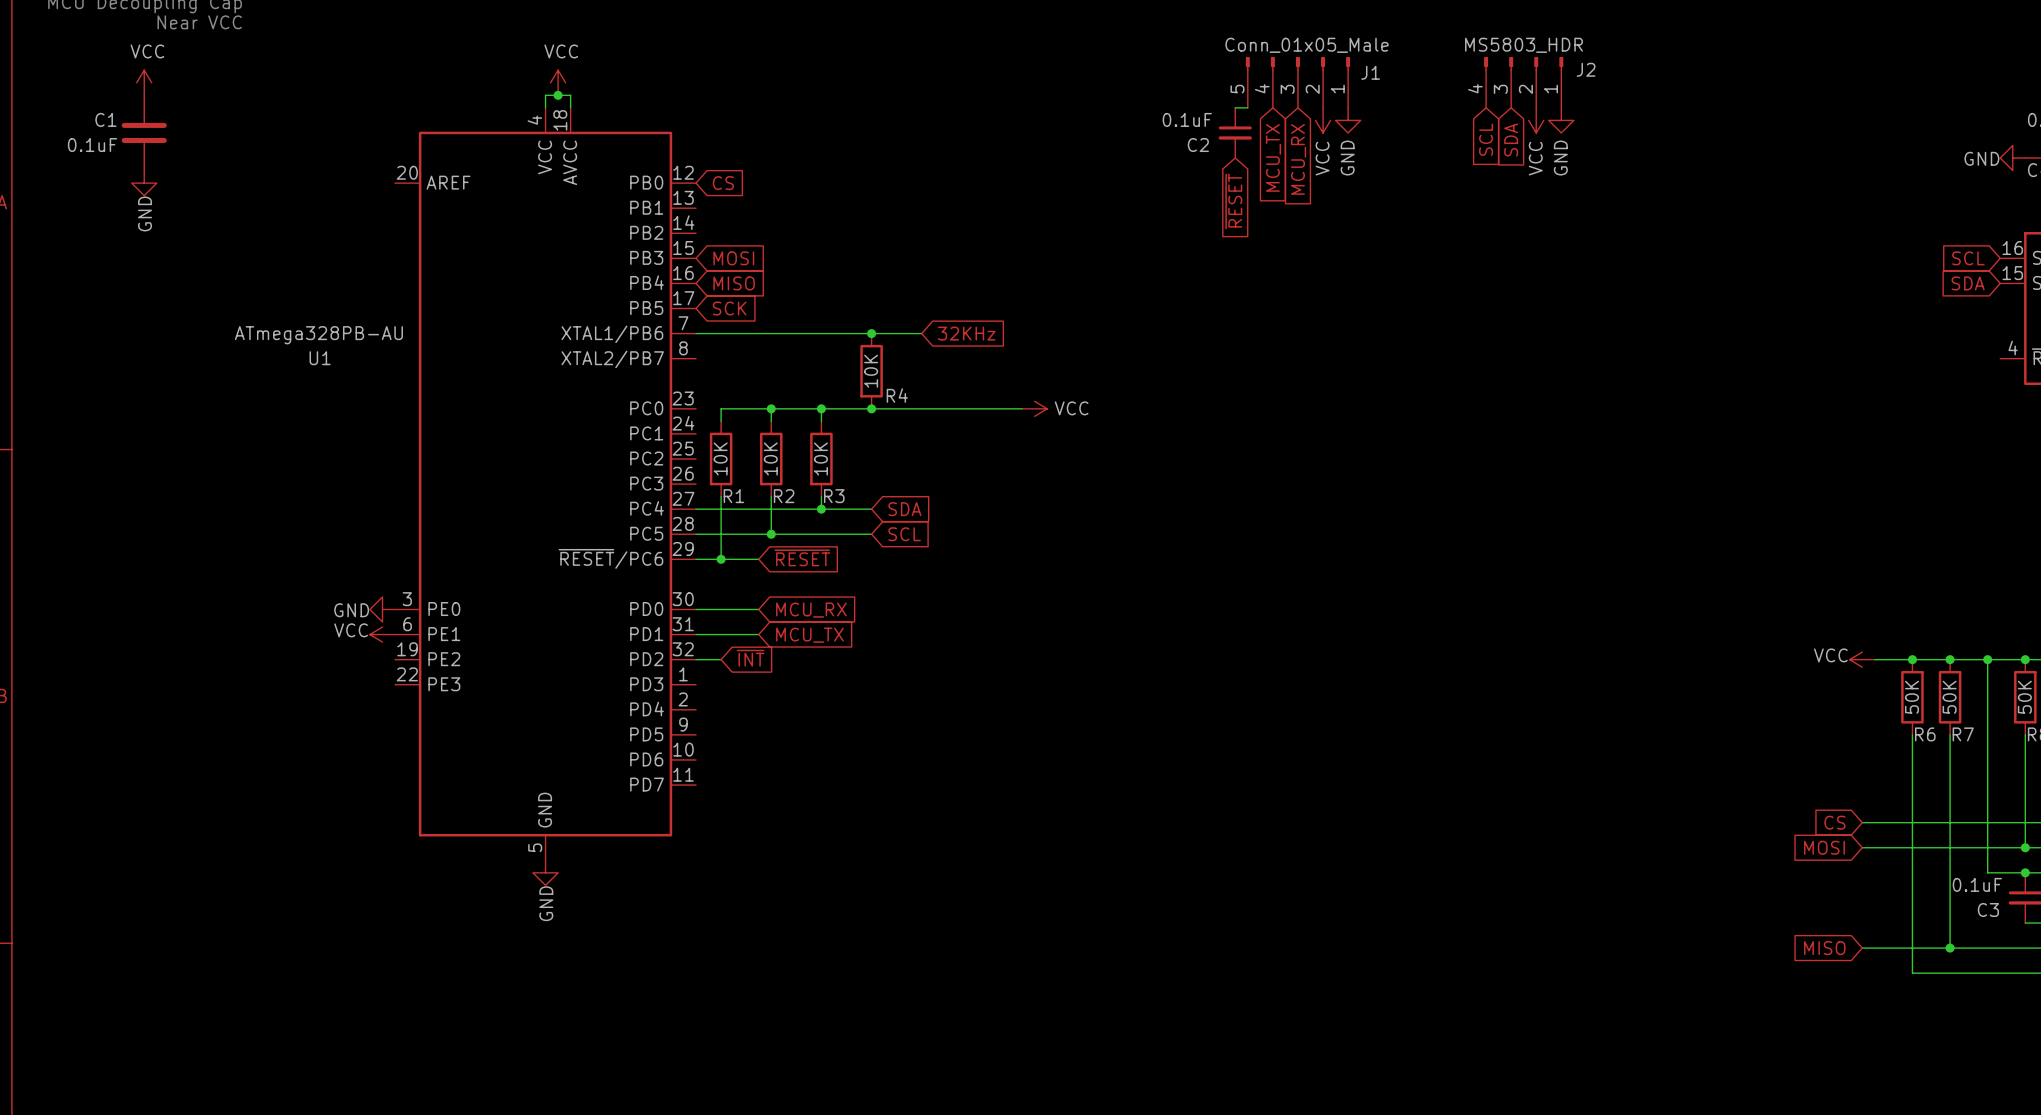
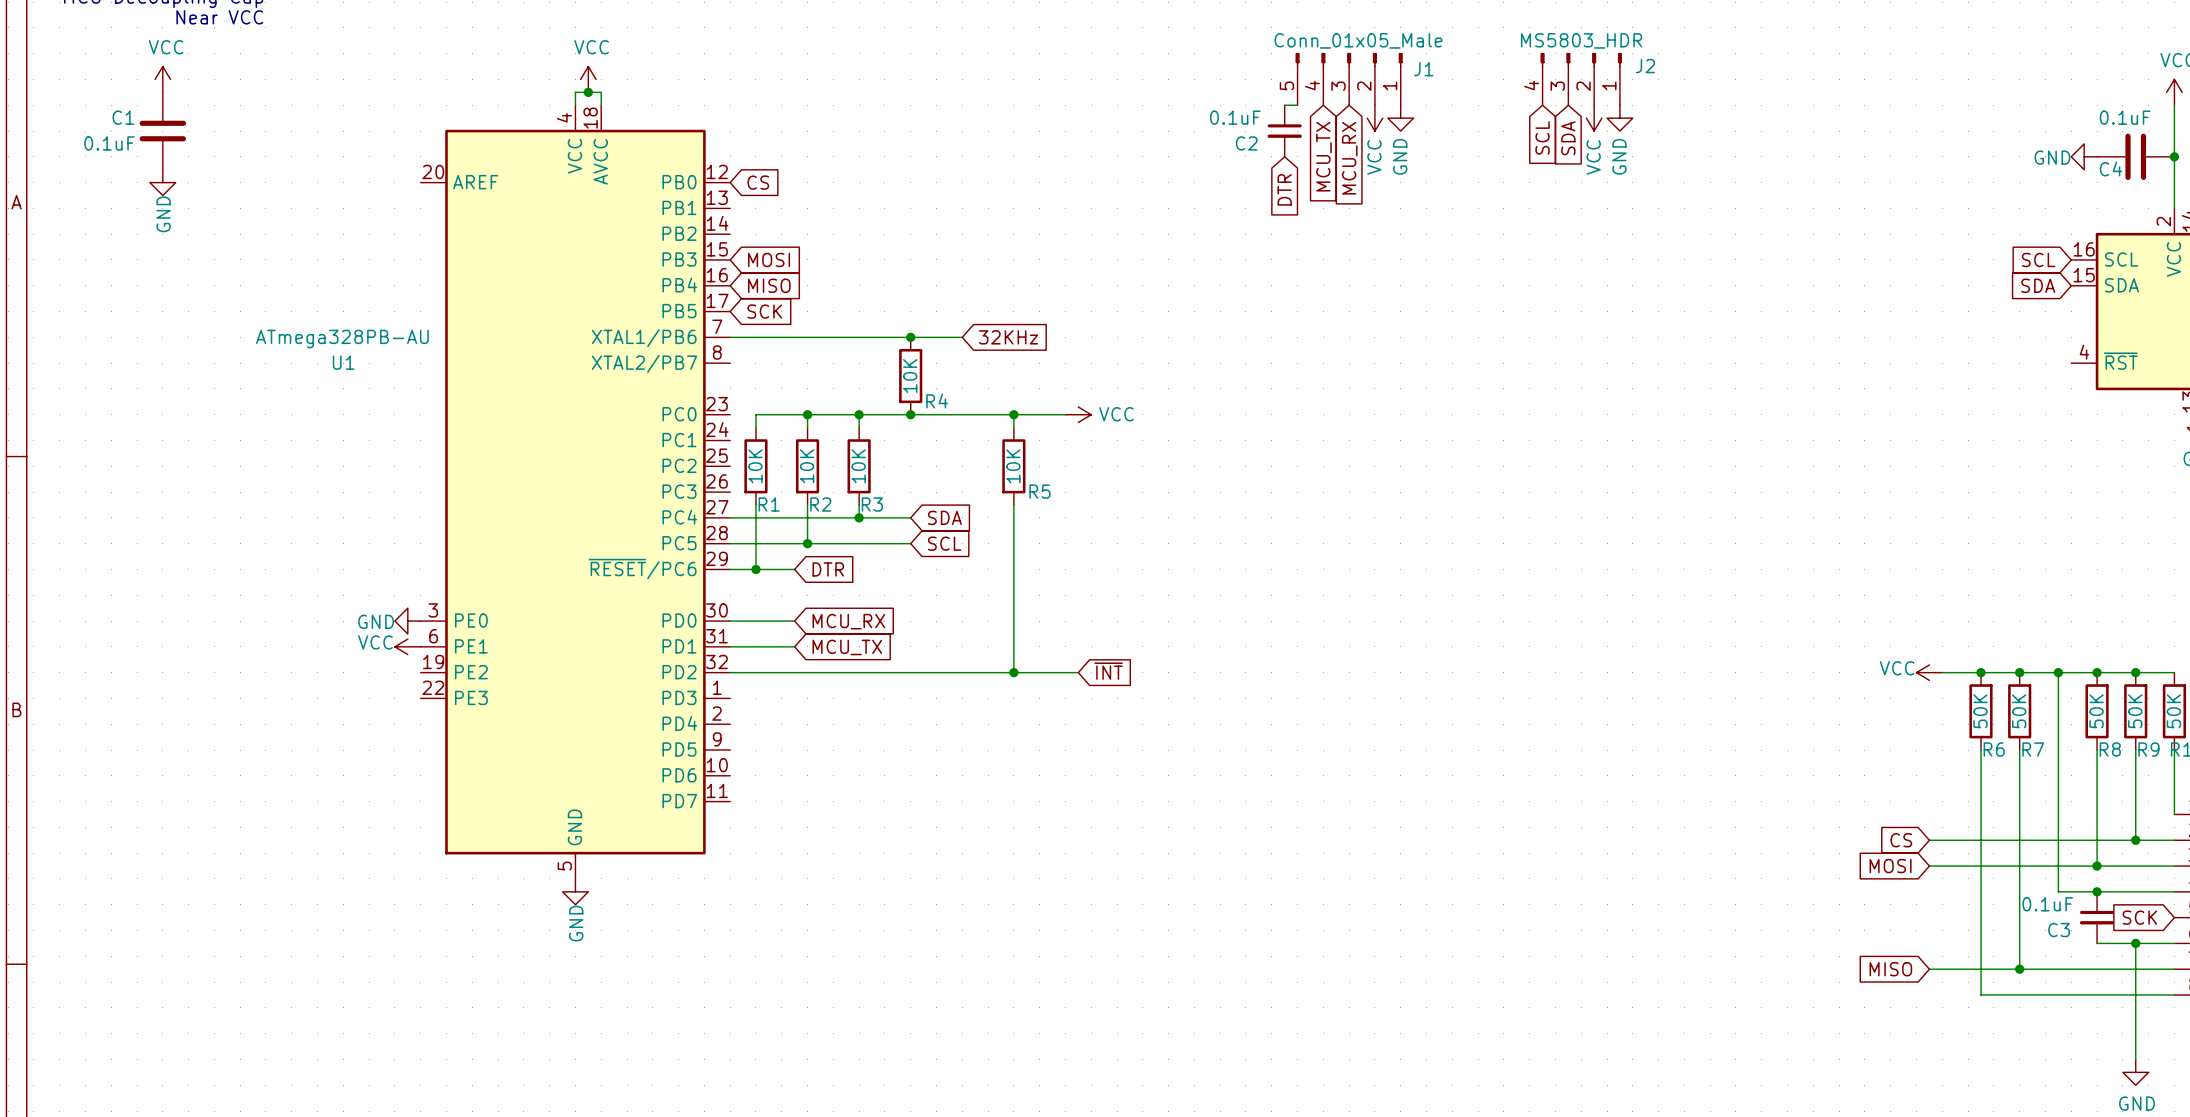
global label: ~{RESET} (1233, 201) -> DTR (1284, 189)
wire: none -> (1013, 414) (1013, 427)
junction: none -> (1013, 414)
R5: none -> 10K (1013, 466)
wire: none -> (1013, 504) (1013, 672)
global label: ~{RESET} (802, 557) -> DTR (828, 569)
global label: ~{INT} (750, 658) -> none
global label: none -> ~{INT} (1108, 671)
wire: none -> (755, 672) (1078, 672)
junction: none -> (1013, 672)

